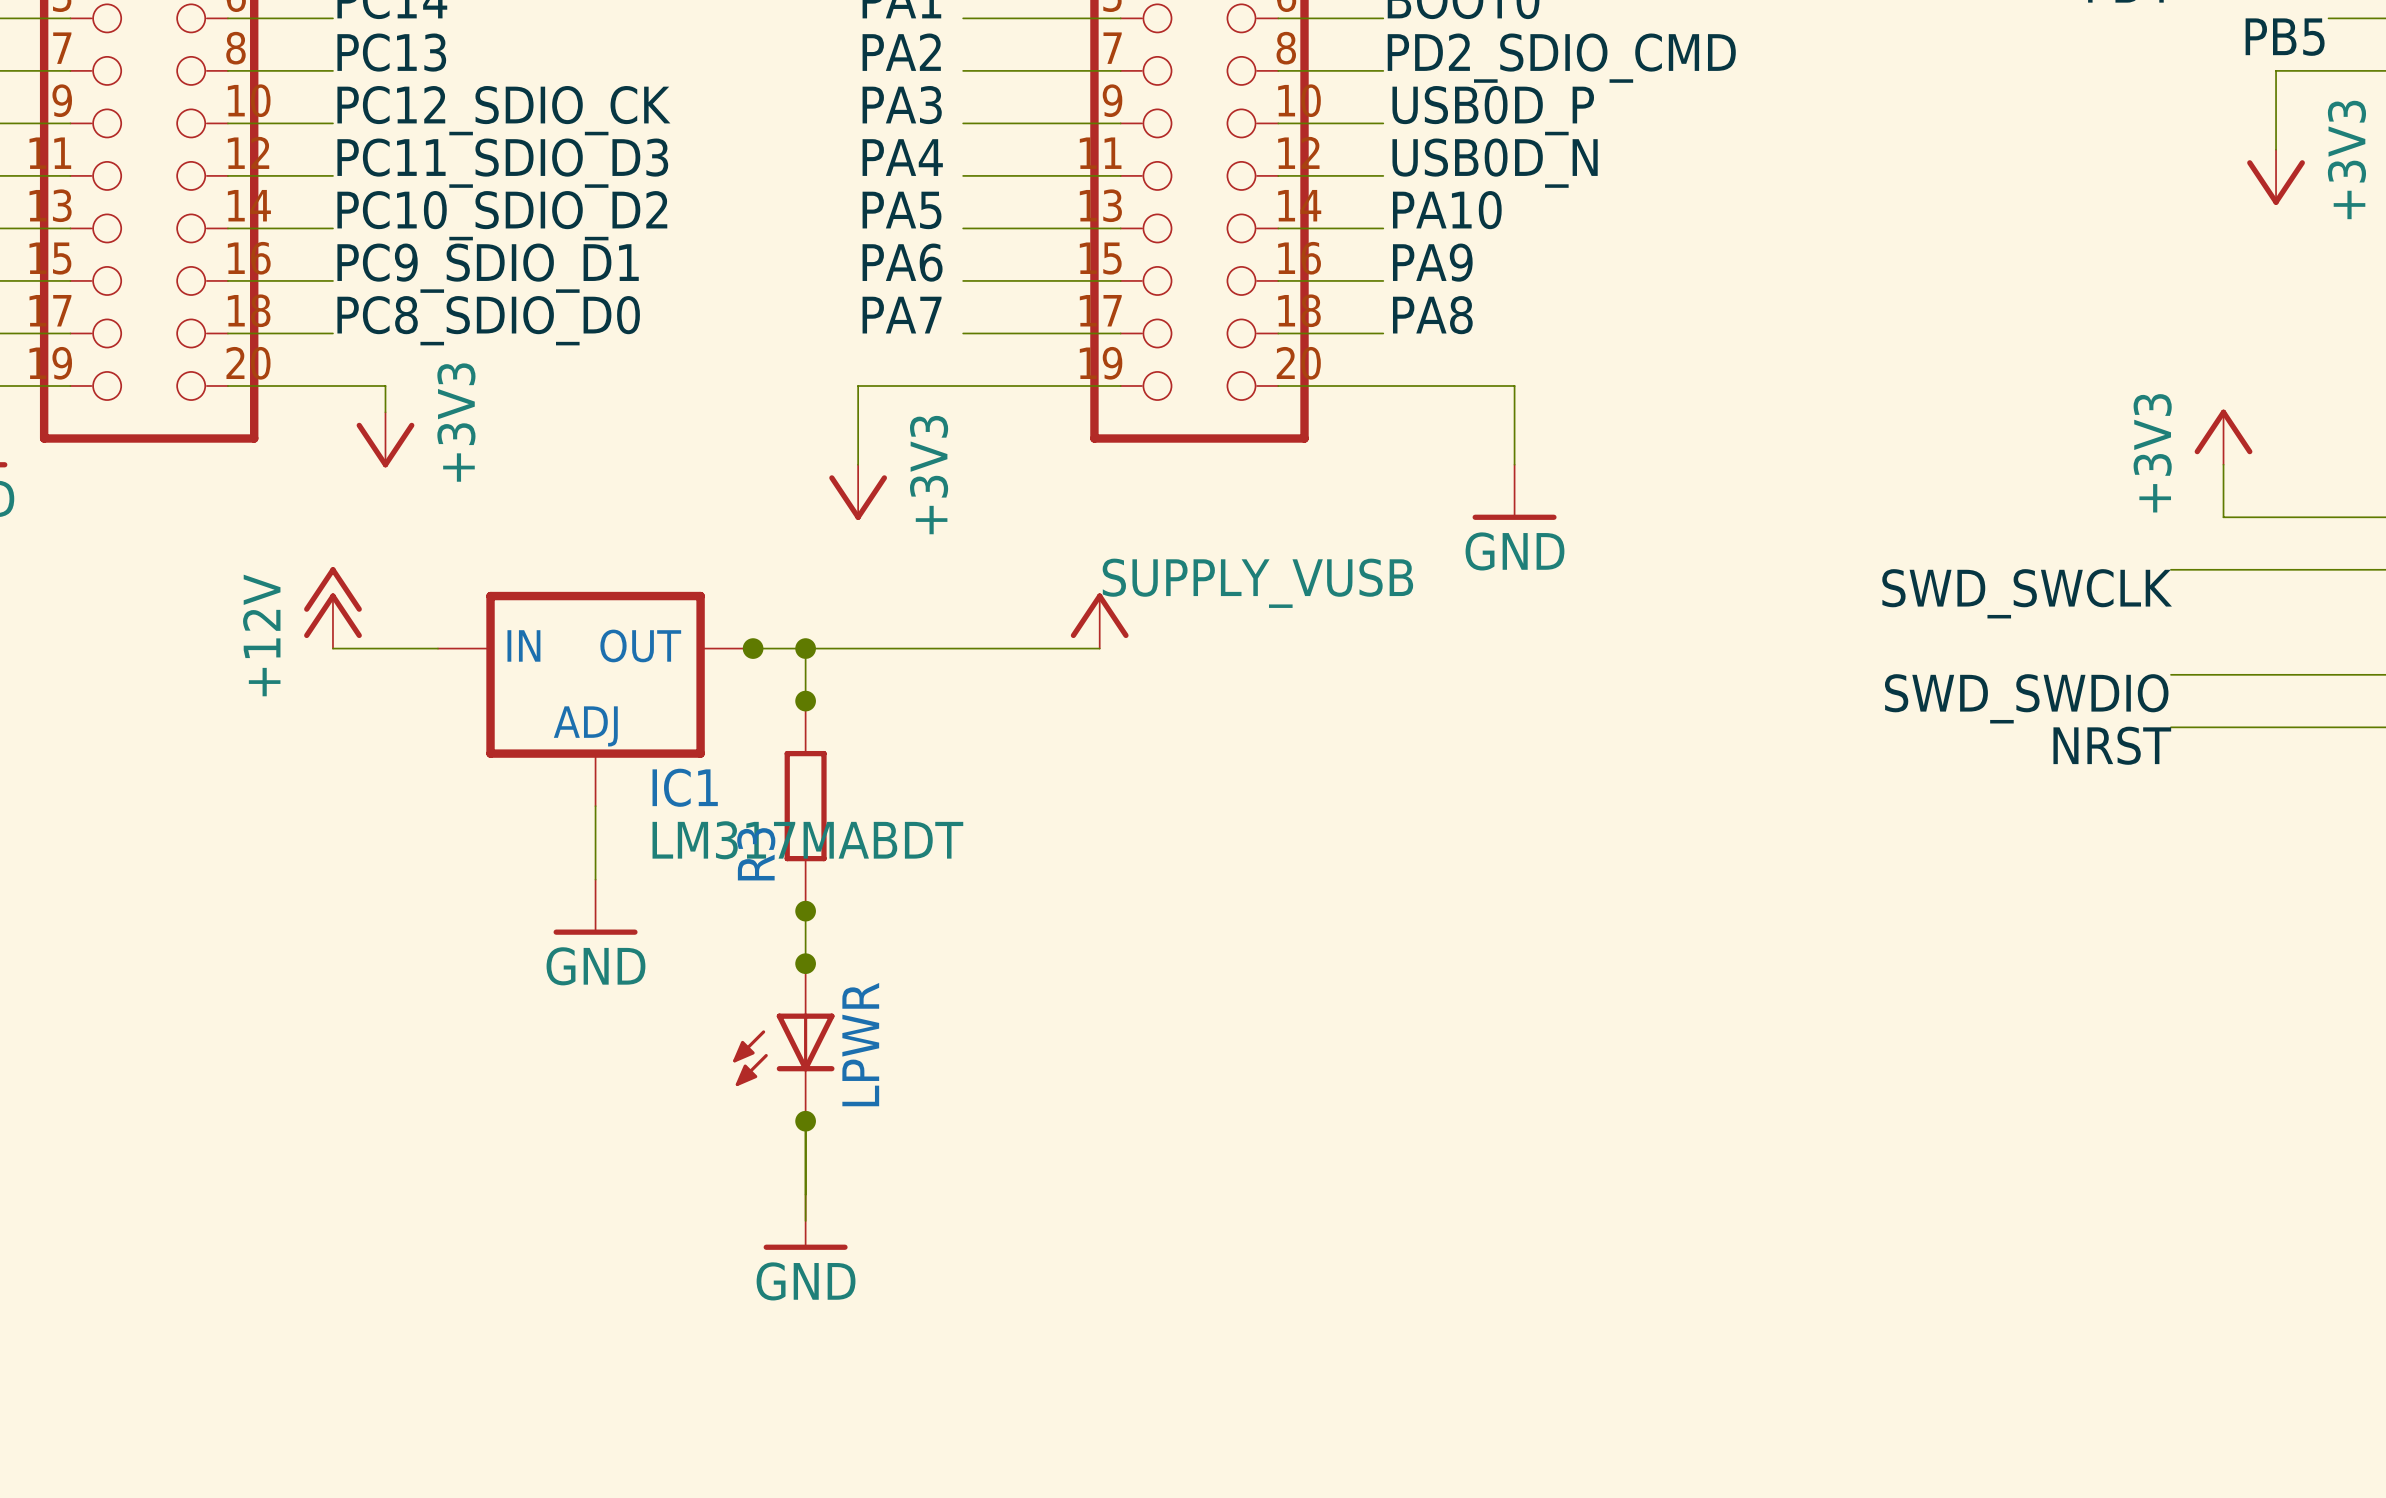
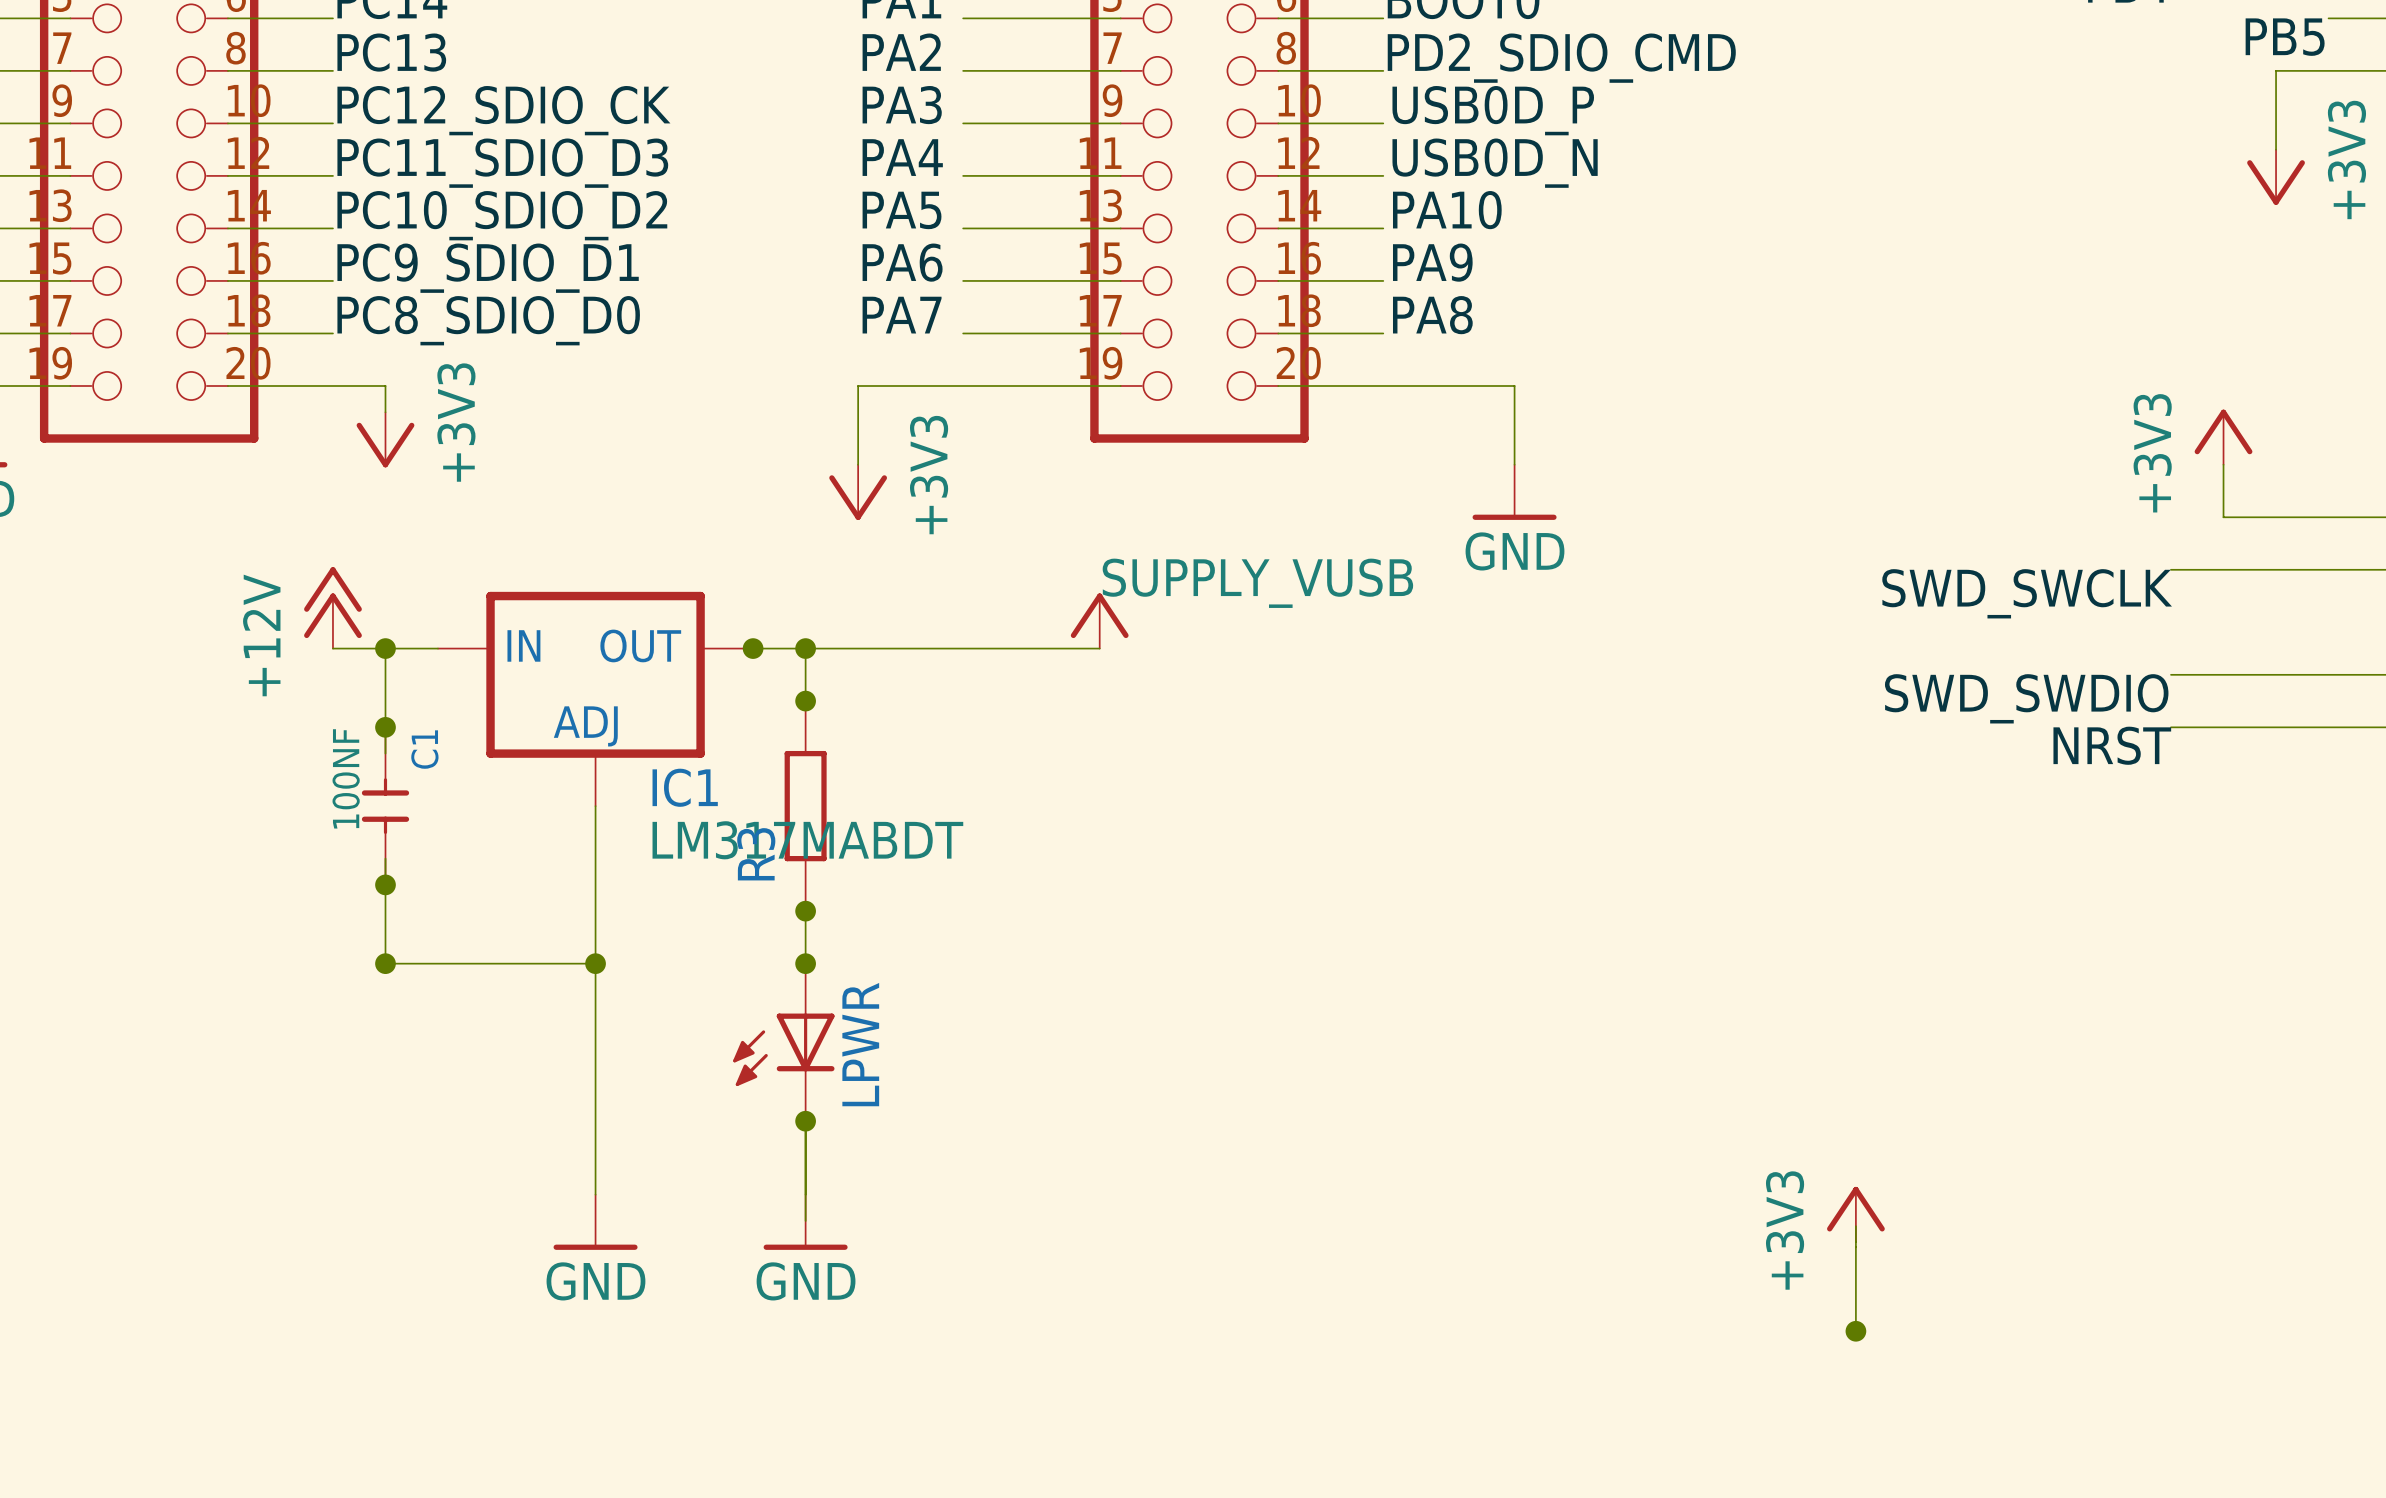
wire: none -> (385, 648) (385, 753)
junction: none -> (385, 648)
junction: none -> (385, 727)
C1: none -> 100NF (385, 806)
wire: none -> (385, 858) (385, 963) (595, 963)
wire: none -> (595, 879) (595, 1194)
junction: none -> (385, 884)
power symbol position: GND (595, 907) -> GND (595, 1222)
junction: none -> (385, 963)
junction: none -> (595, 963)
power symbol: none -> +3V3 (1855, 1214)
wire: none -> (1855, 1226) (1855, 1331) (1861, 1331)
junction: none -> (1855, 1331)

